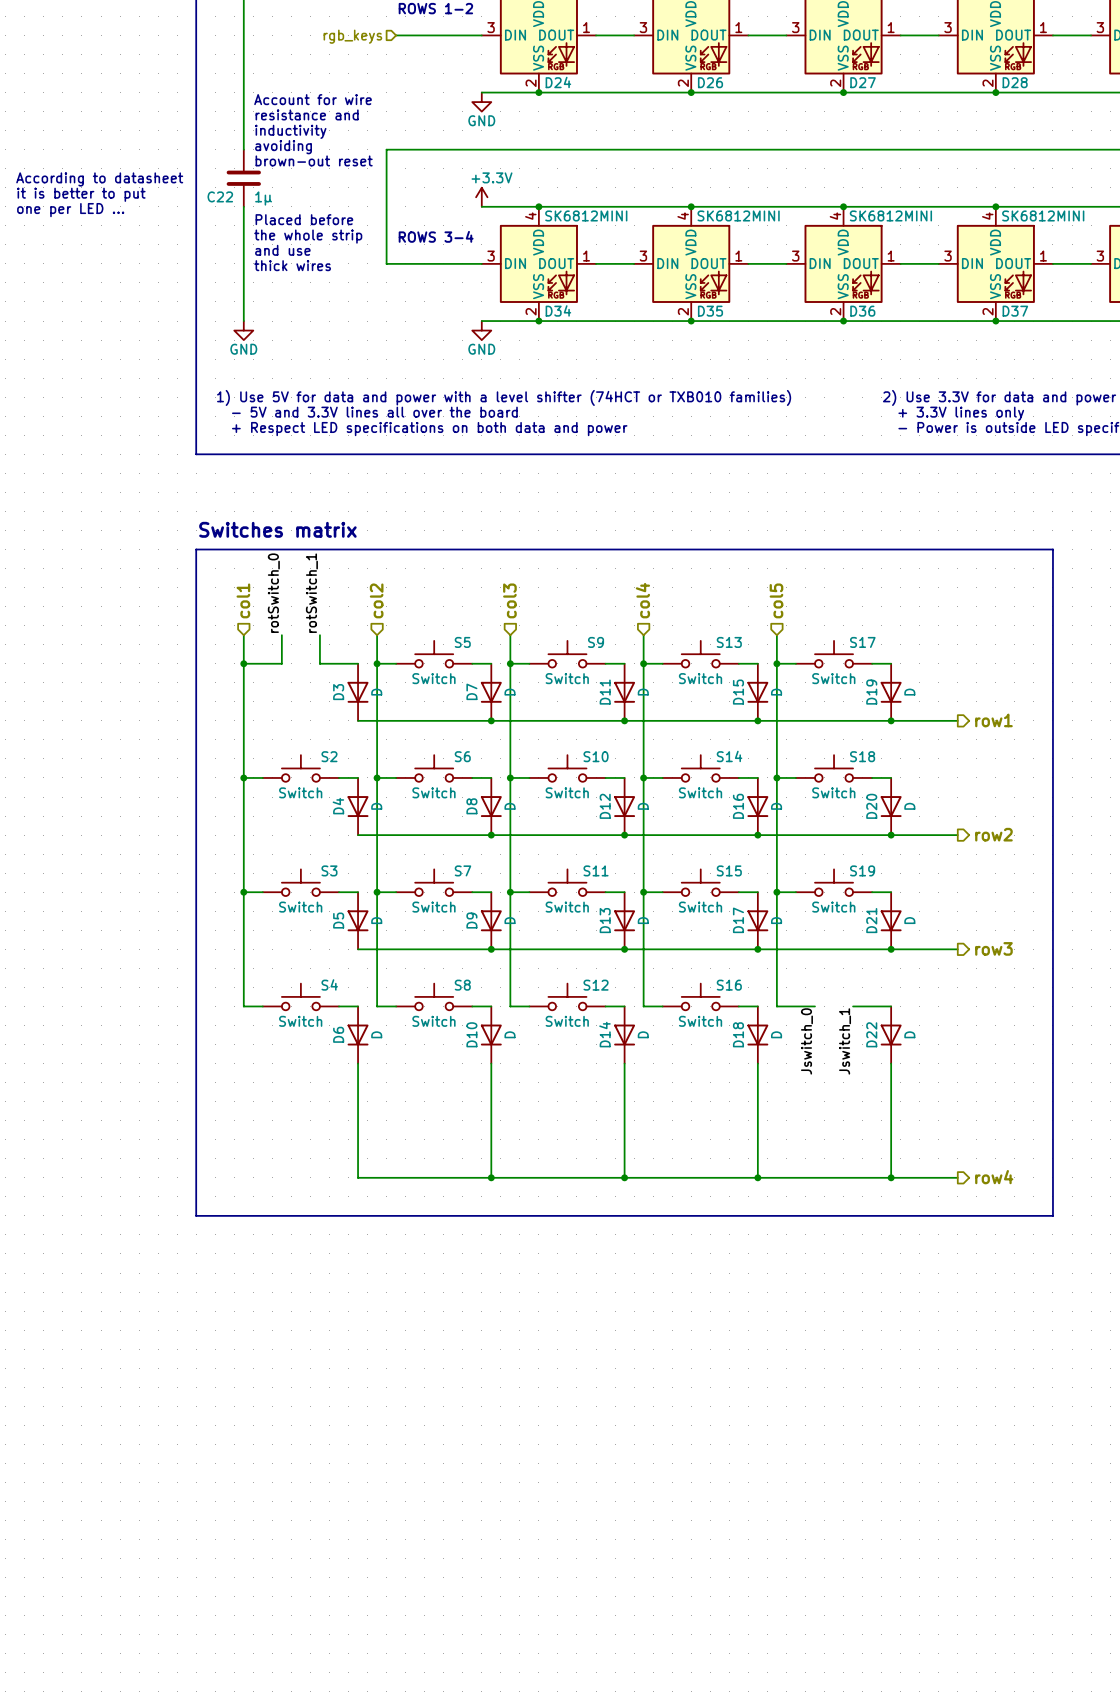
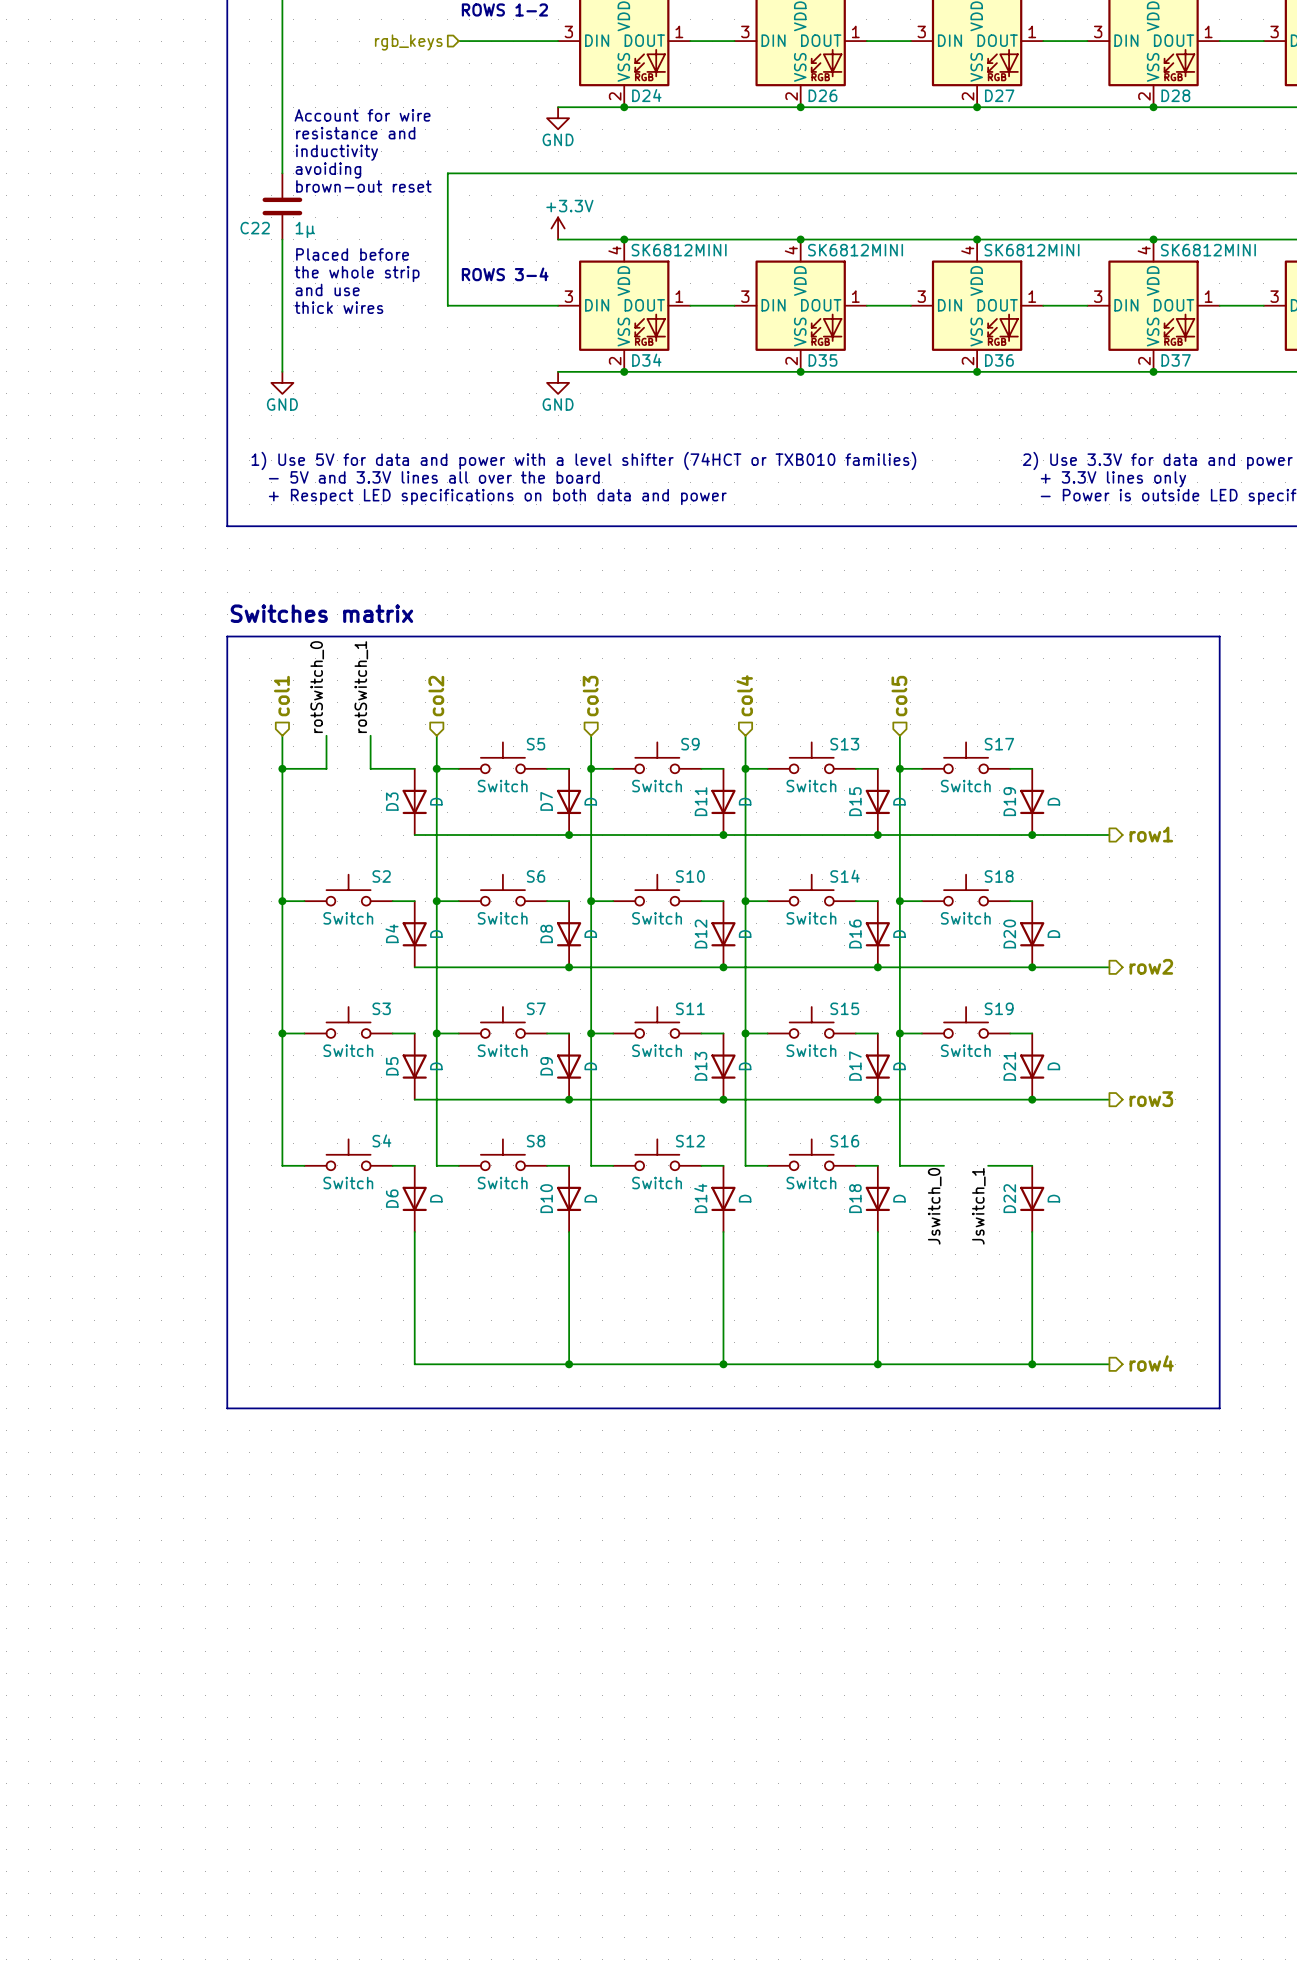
text: According to datasheet (99, 179) -> none
text: it is better to put (81, 194) -> none
text: one per LED ... (70, 210) -> none

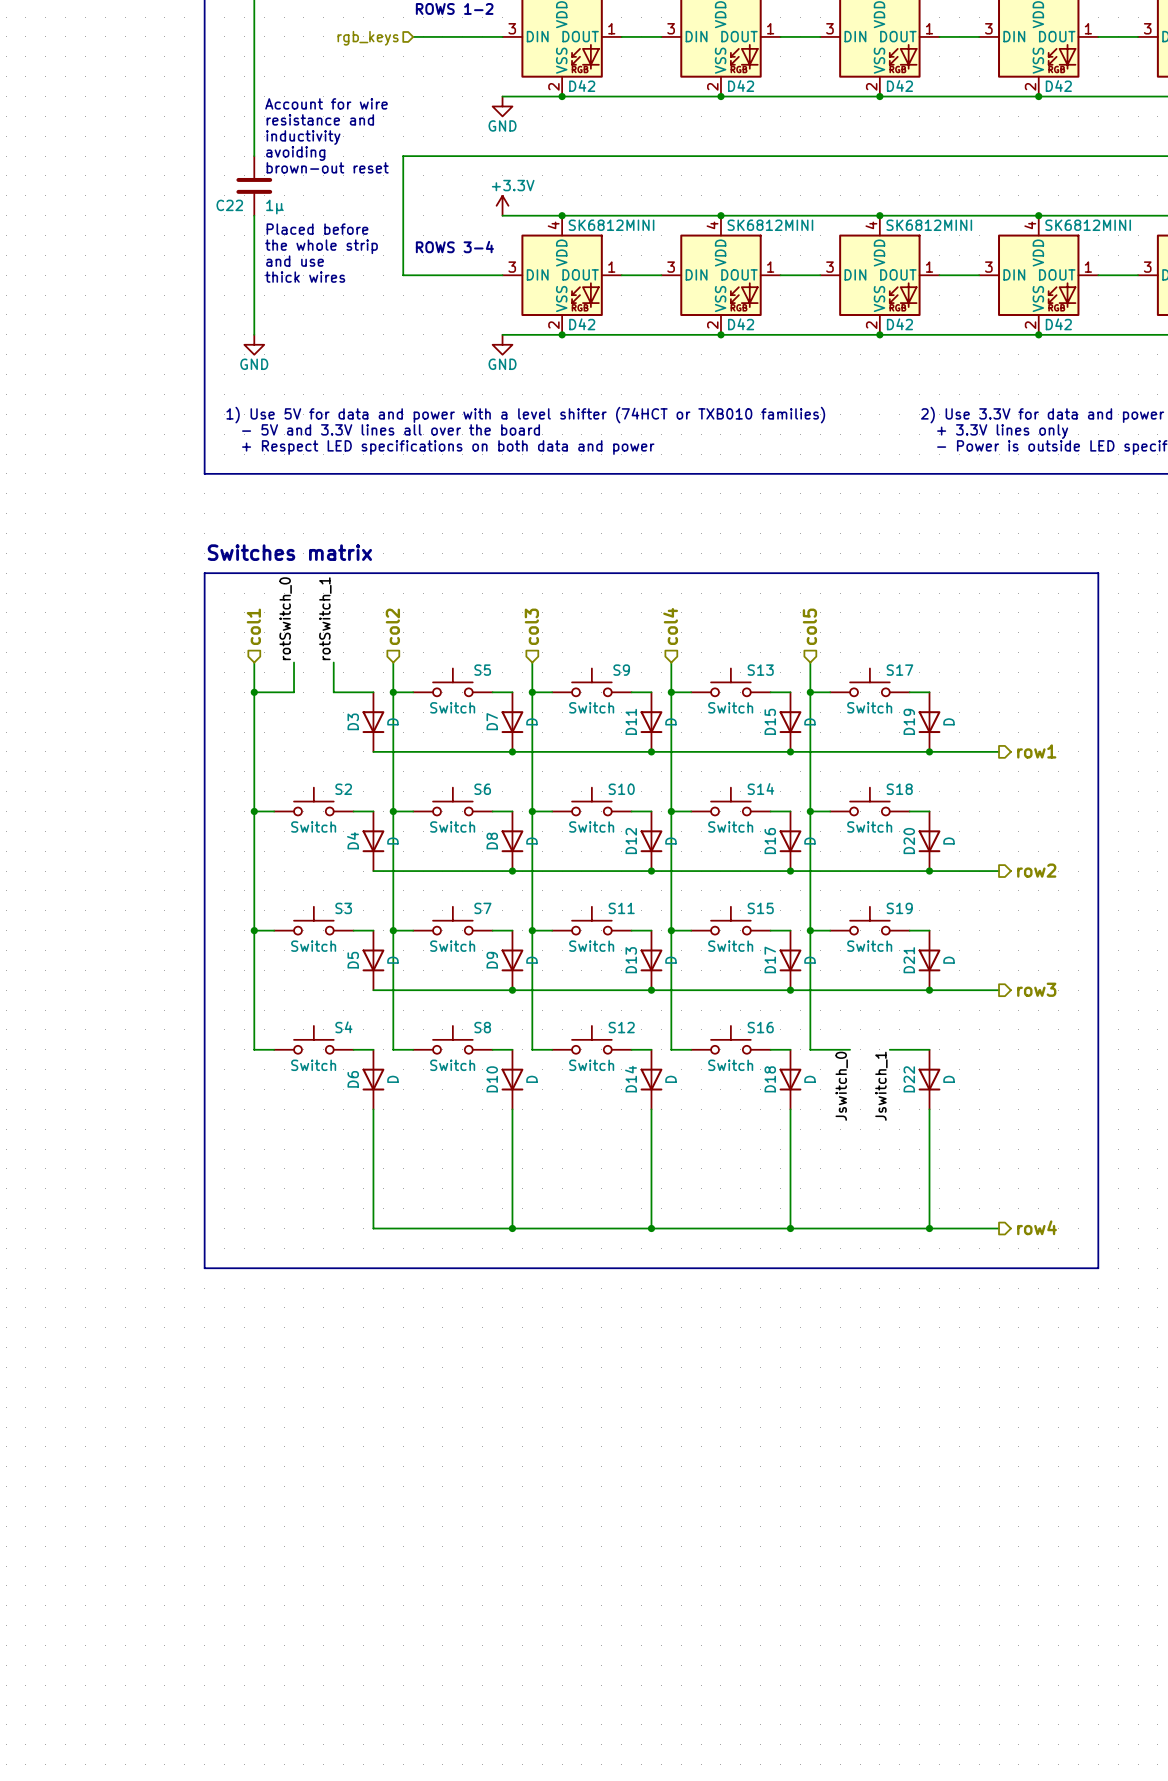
D24 name: D24 (646, 95) -> D42 (582, 86)
D26 name: D26 (822, 95) -> D42 (741, 86)
D27 name: D27 (999, 95) -> D42 (899, 86)
D28 name: D28 (1175, 95) -> D42 (1058, 86)
D34 name: D34 (646, 360) -> D42 (582, 324)
D35 name: D35 (822, 360) -> D42 (741, 324)
D36 name: D36 (999, 360) -> D42 (899, 324)
D37 name: D37 (1176, 360) -> D42 (1058, 324)

